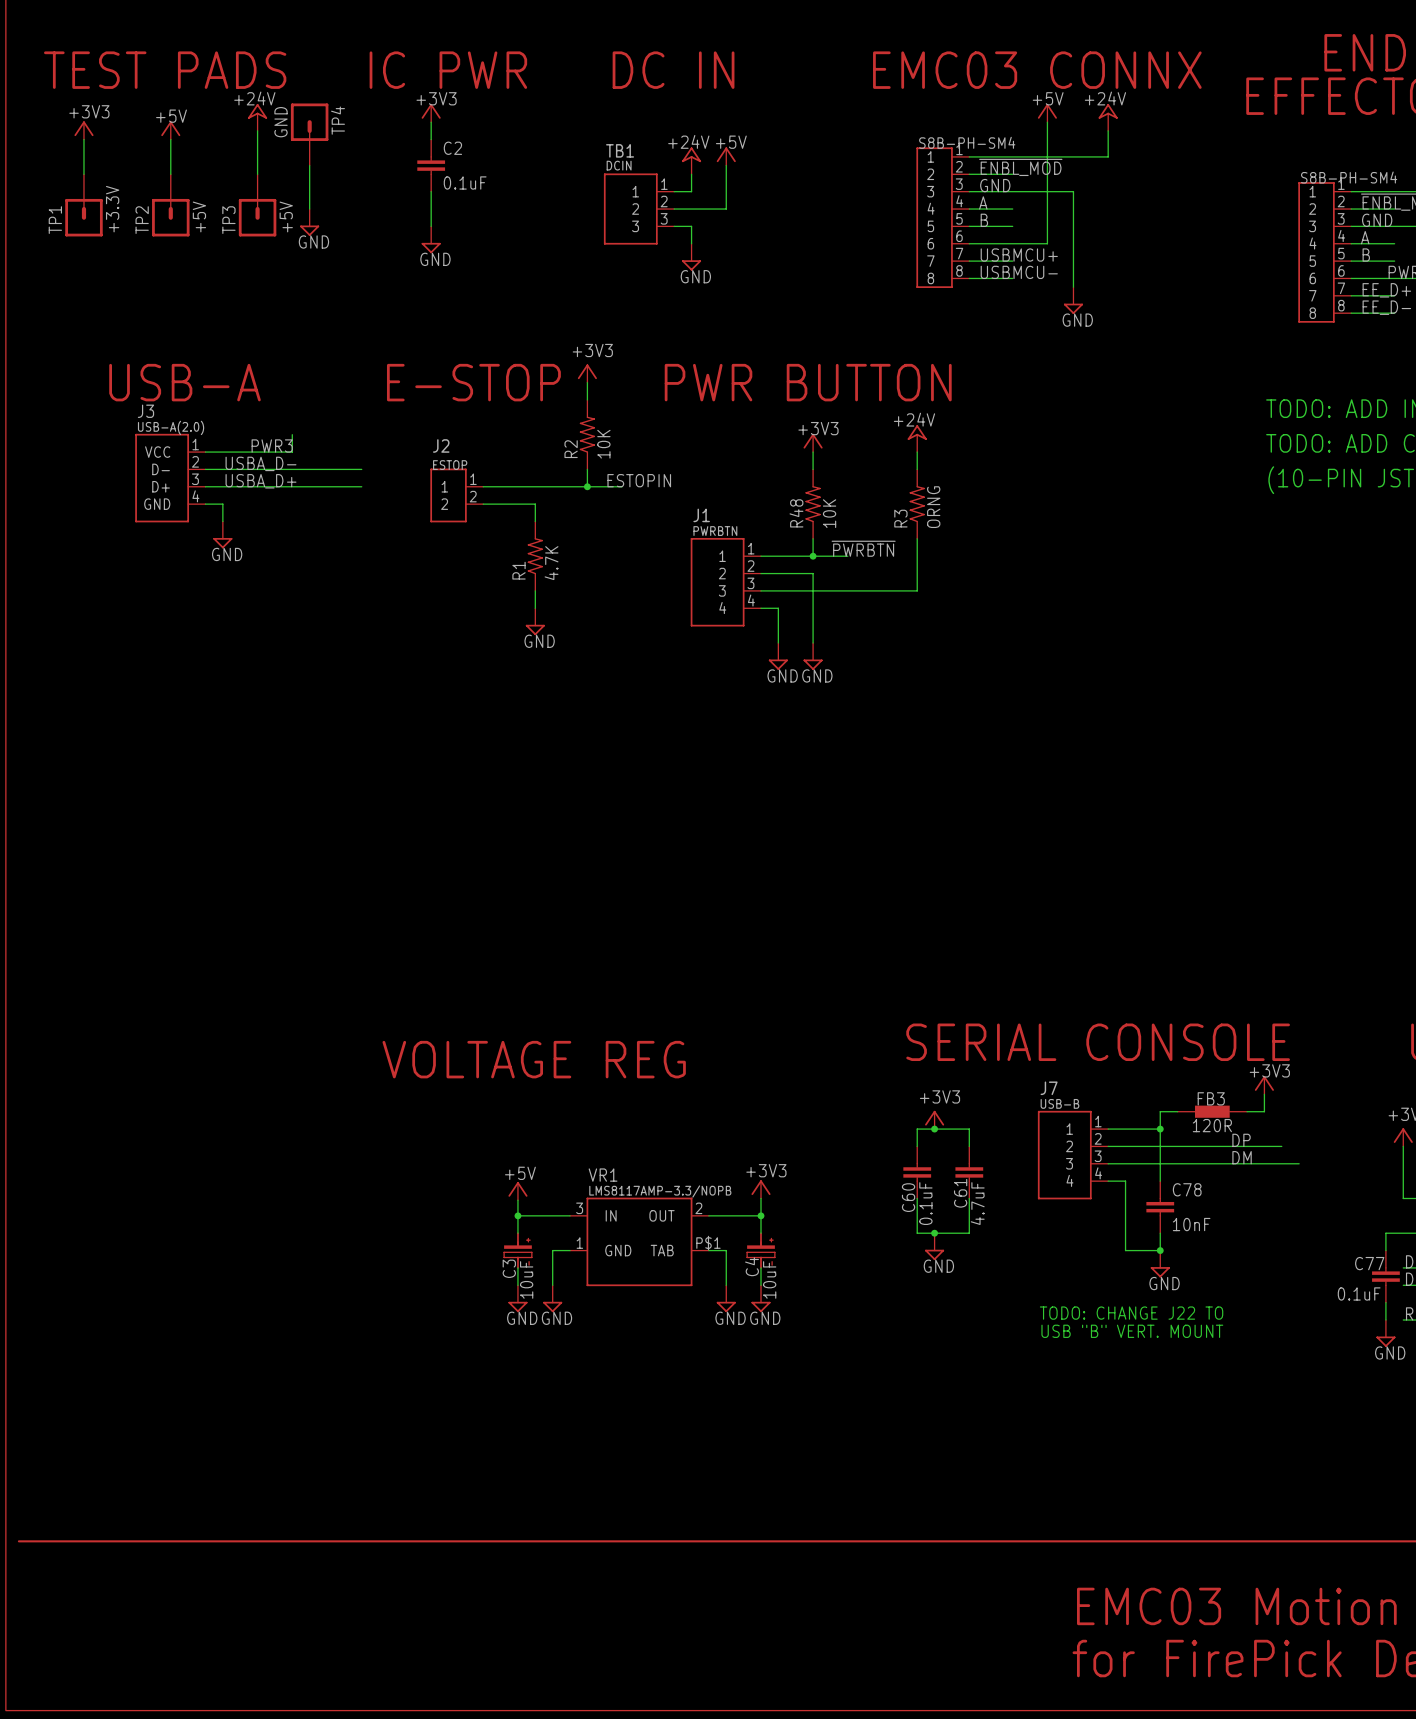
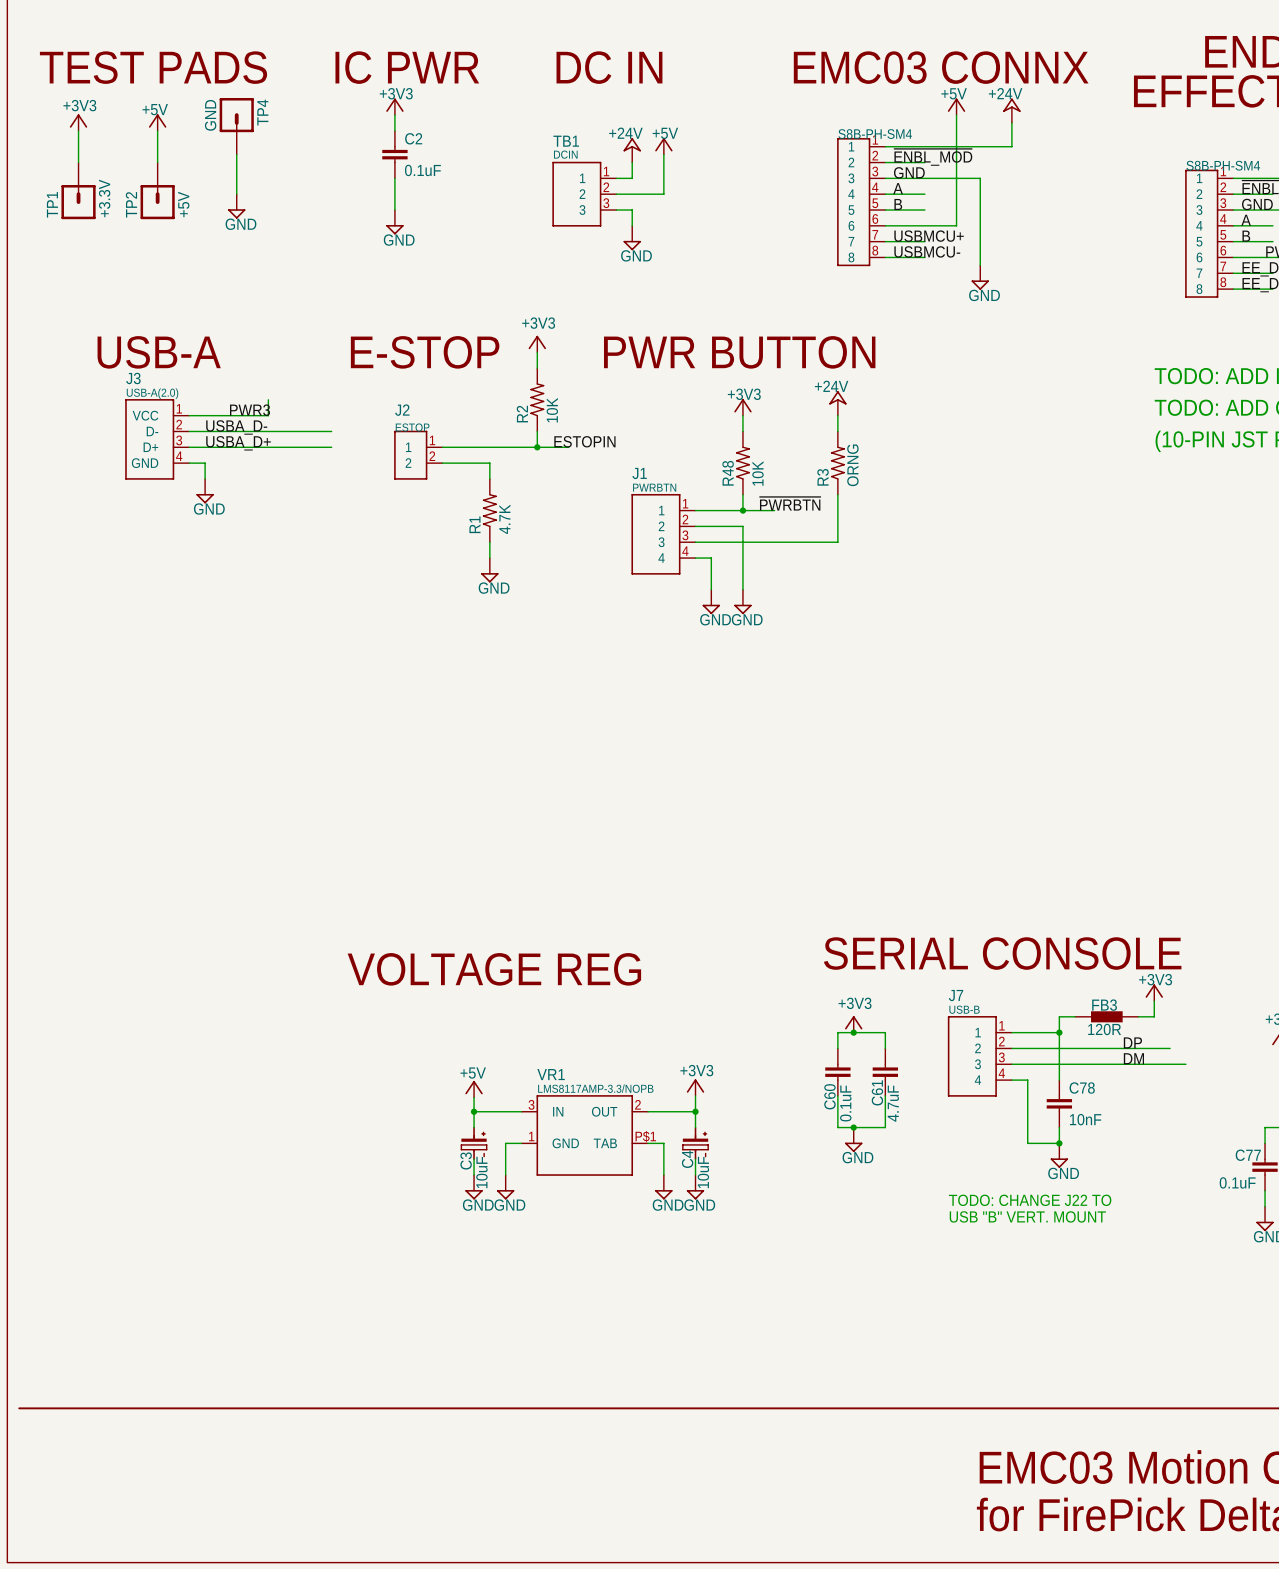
power symbol: +24V (257, 117) -> none
TP4 position: (309, 134) -> (236, 126)
wire: (309, 165) (309, 209) -> none
TP3: +5V (257, 205) -> none
power symbol position: GND (309, 222) -> GND (236, 206)

